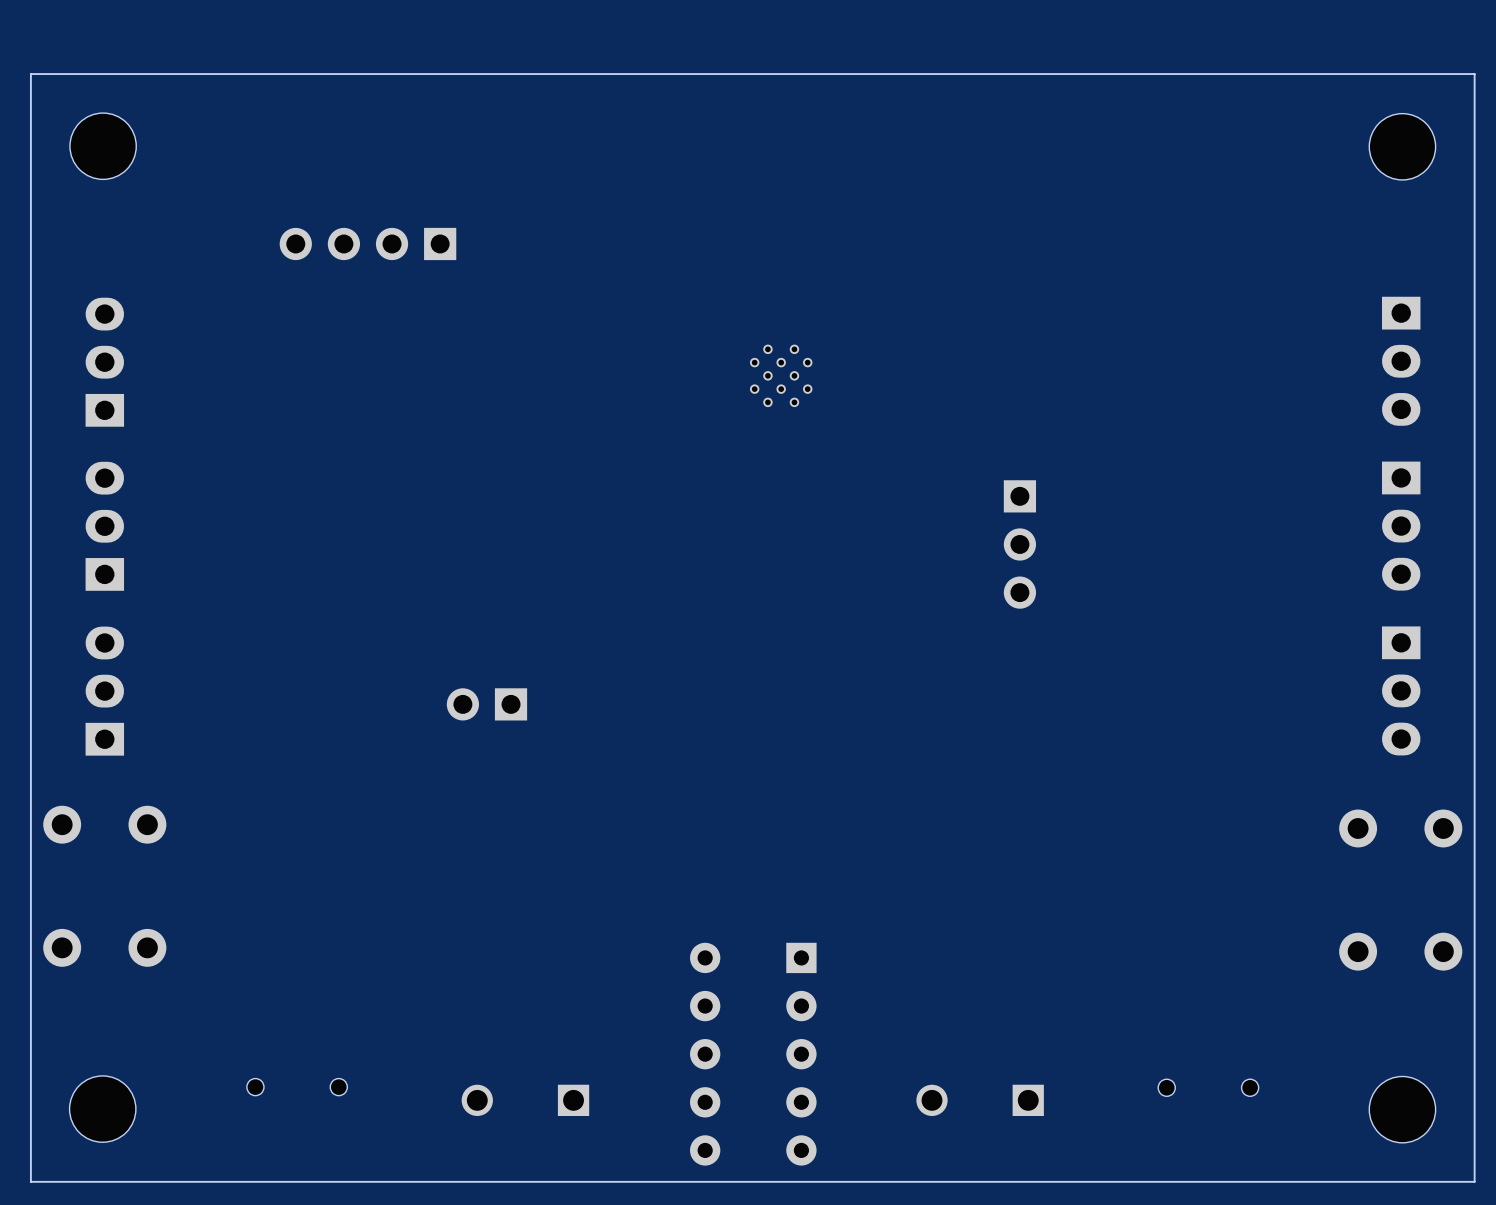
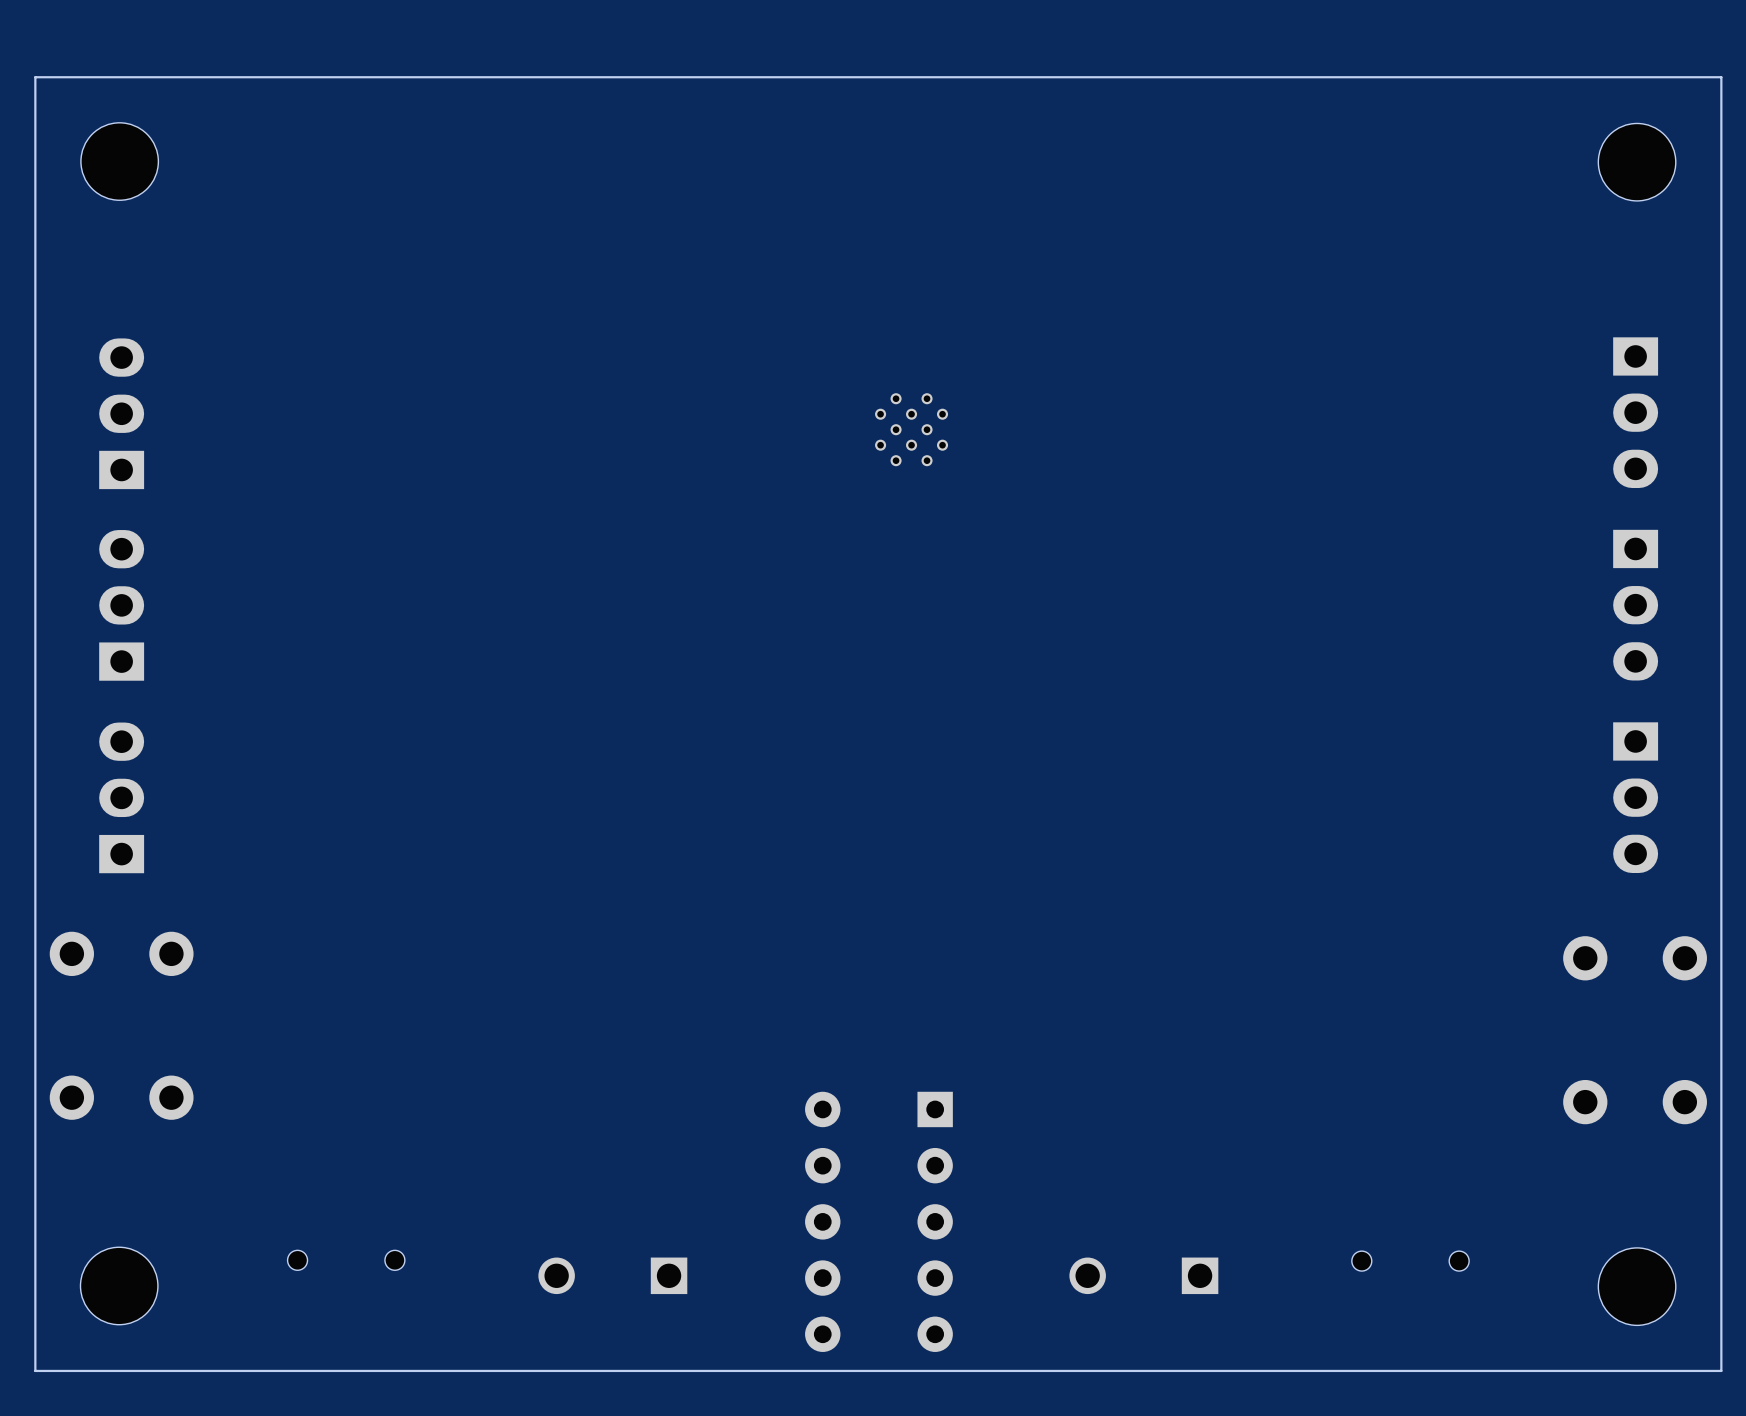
part: (367, 243) -> none
part: (1019, 544) -> none
part: (486, 704) -> none

